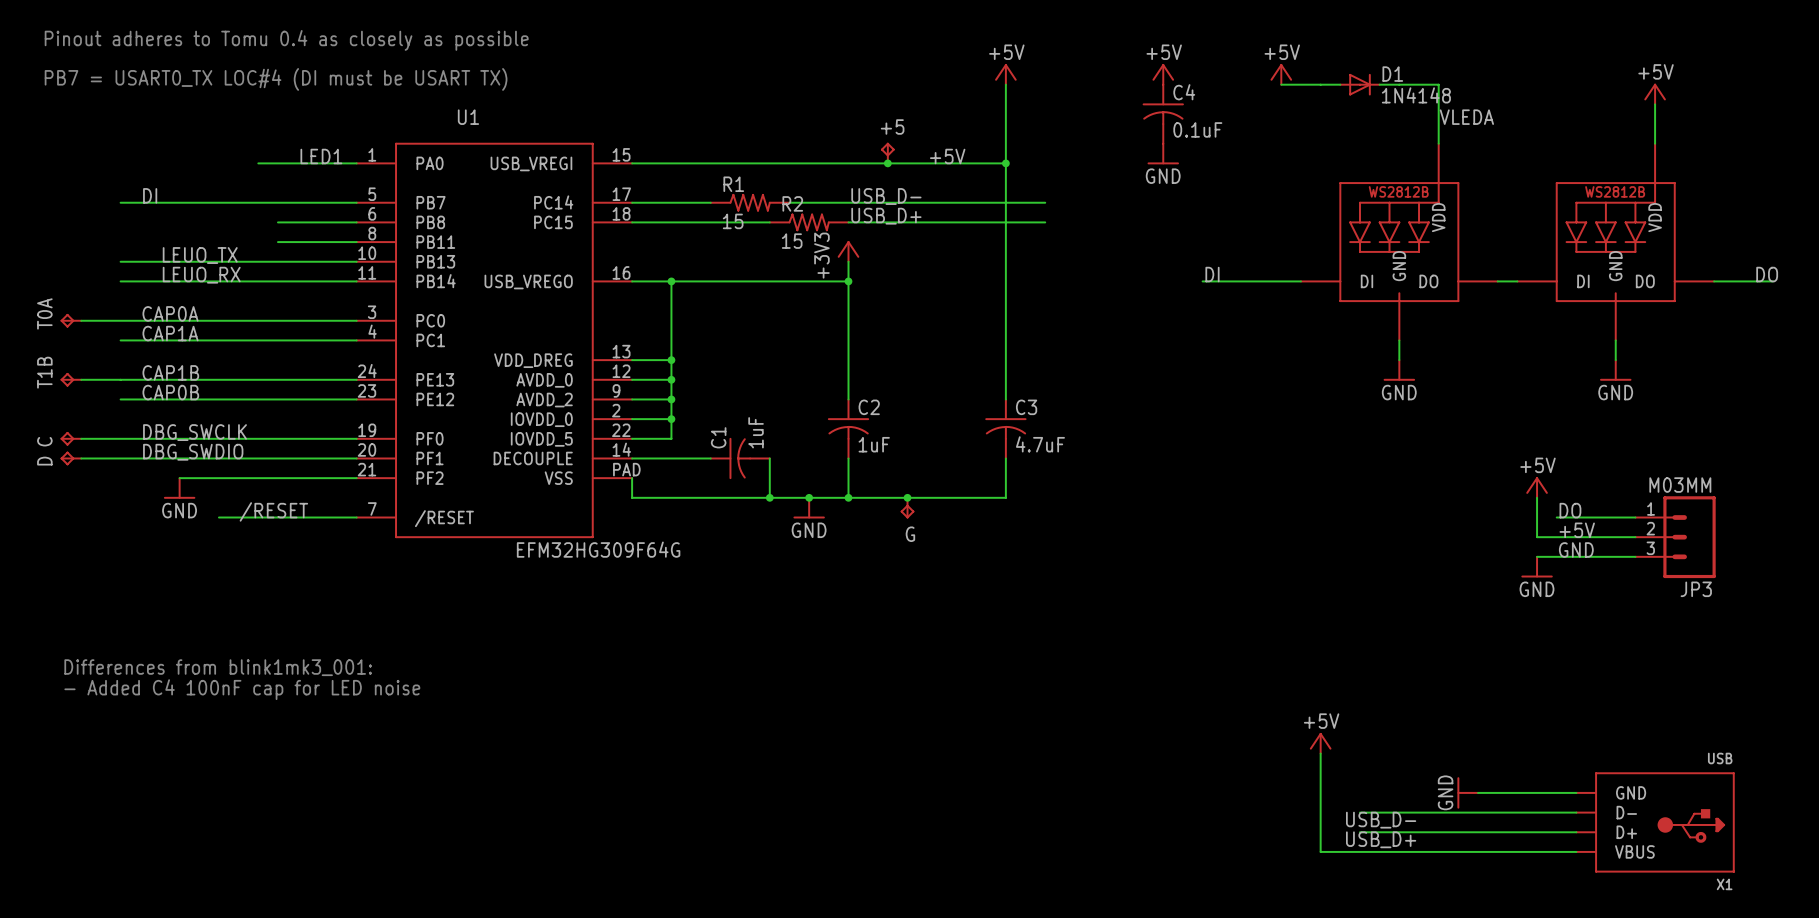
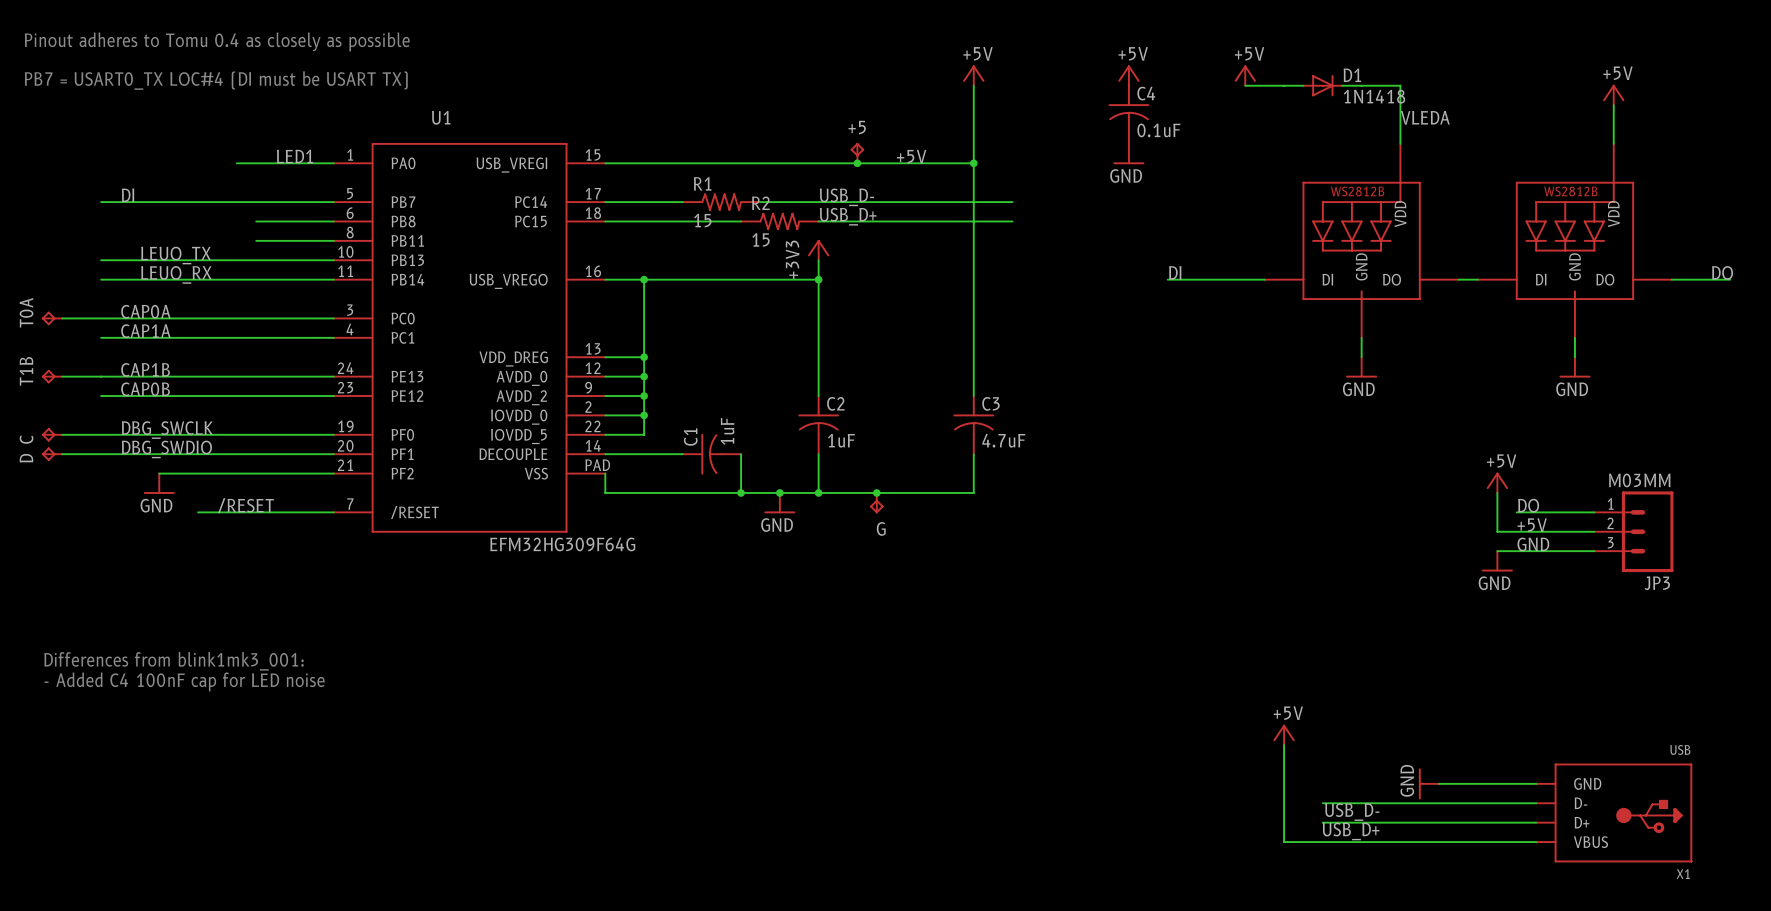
D1 value: 1N4148 (1416, 95) -> 1N1418 (1374, 96)

